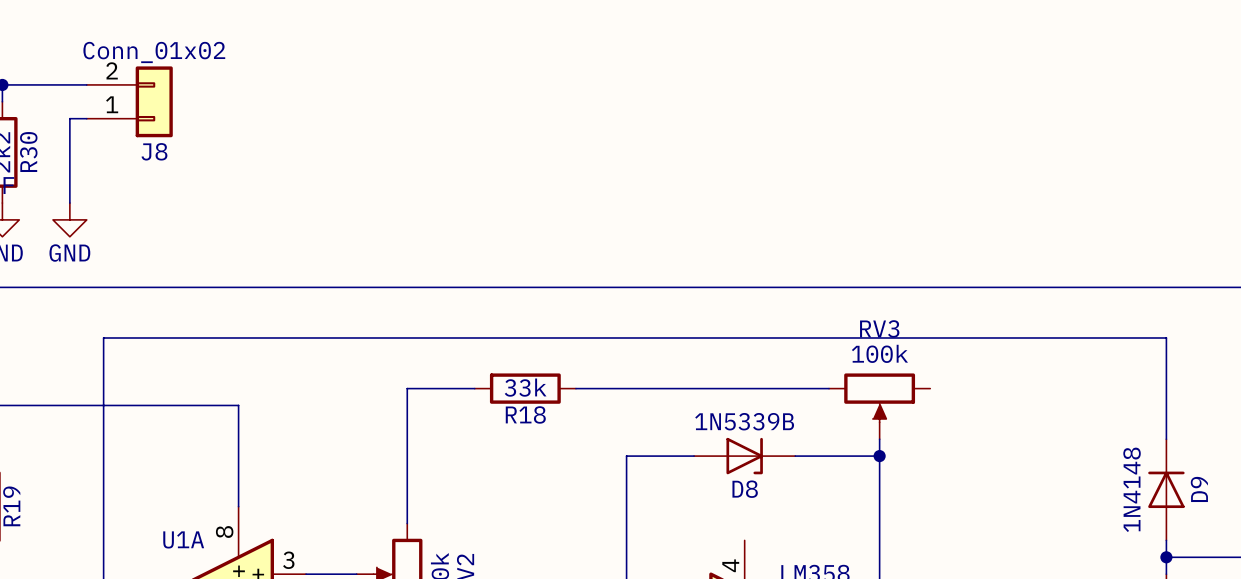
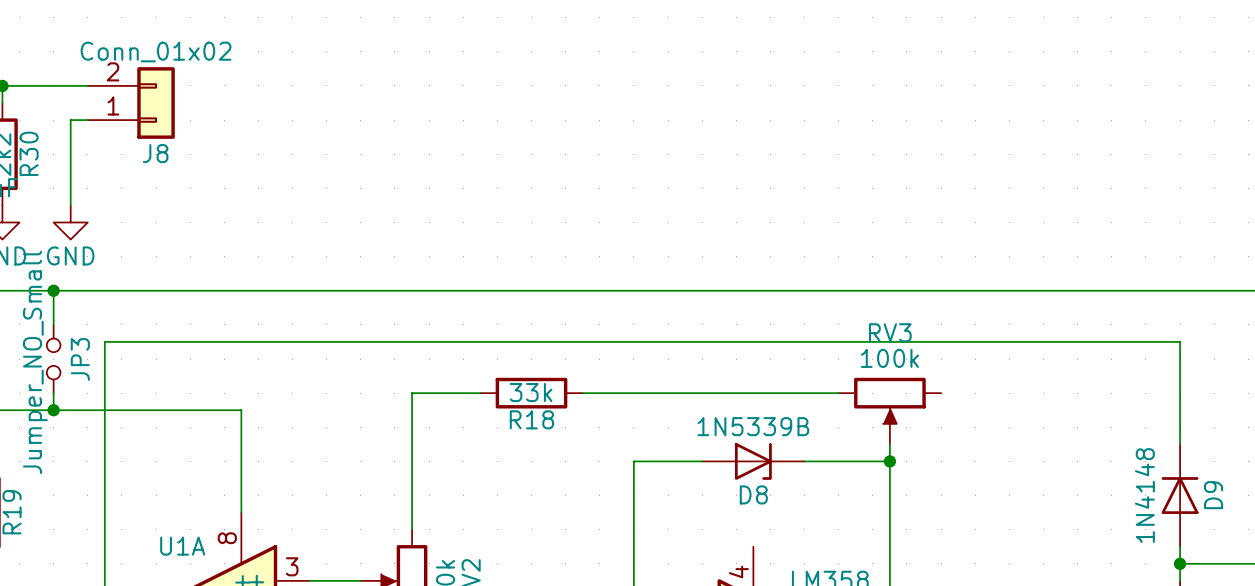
wire: none -> (53, 290) (53, 324)
junction: none -> (53, 290)
JP3: none -> Jumper_NO_Small (53, 359)
wire: none -> (53, 393) (53, 410)
junction: none -> (53, 410)

